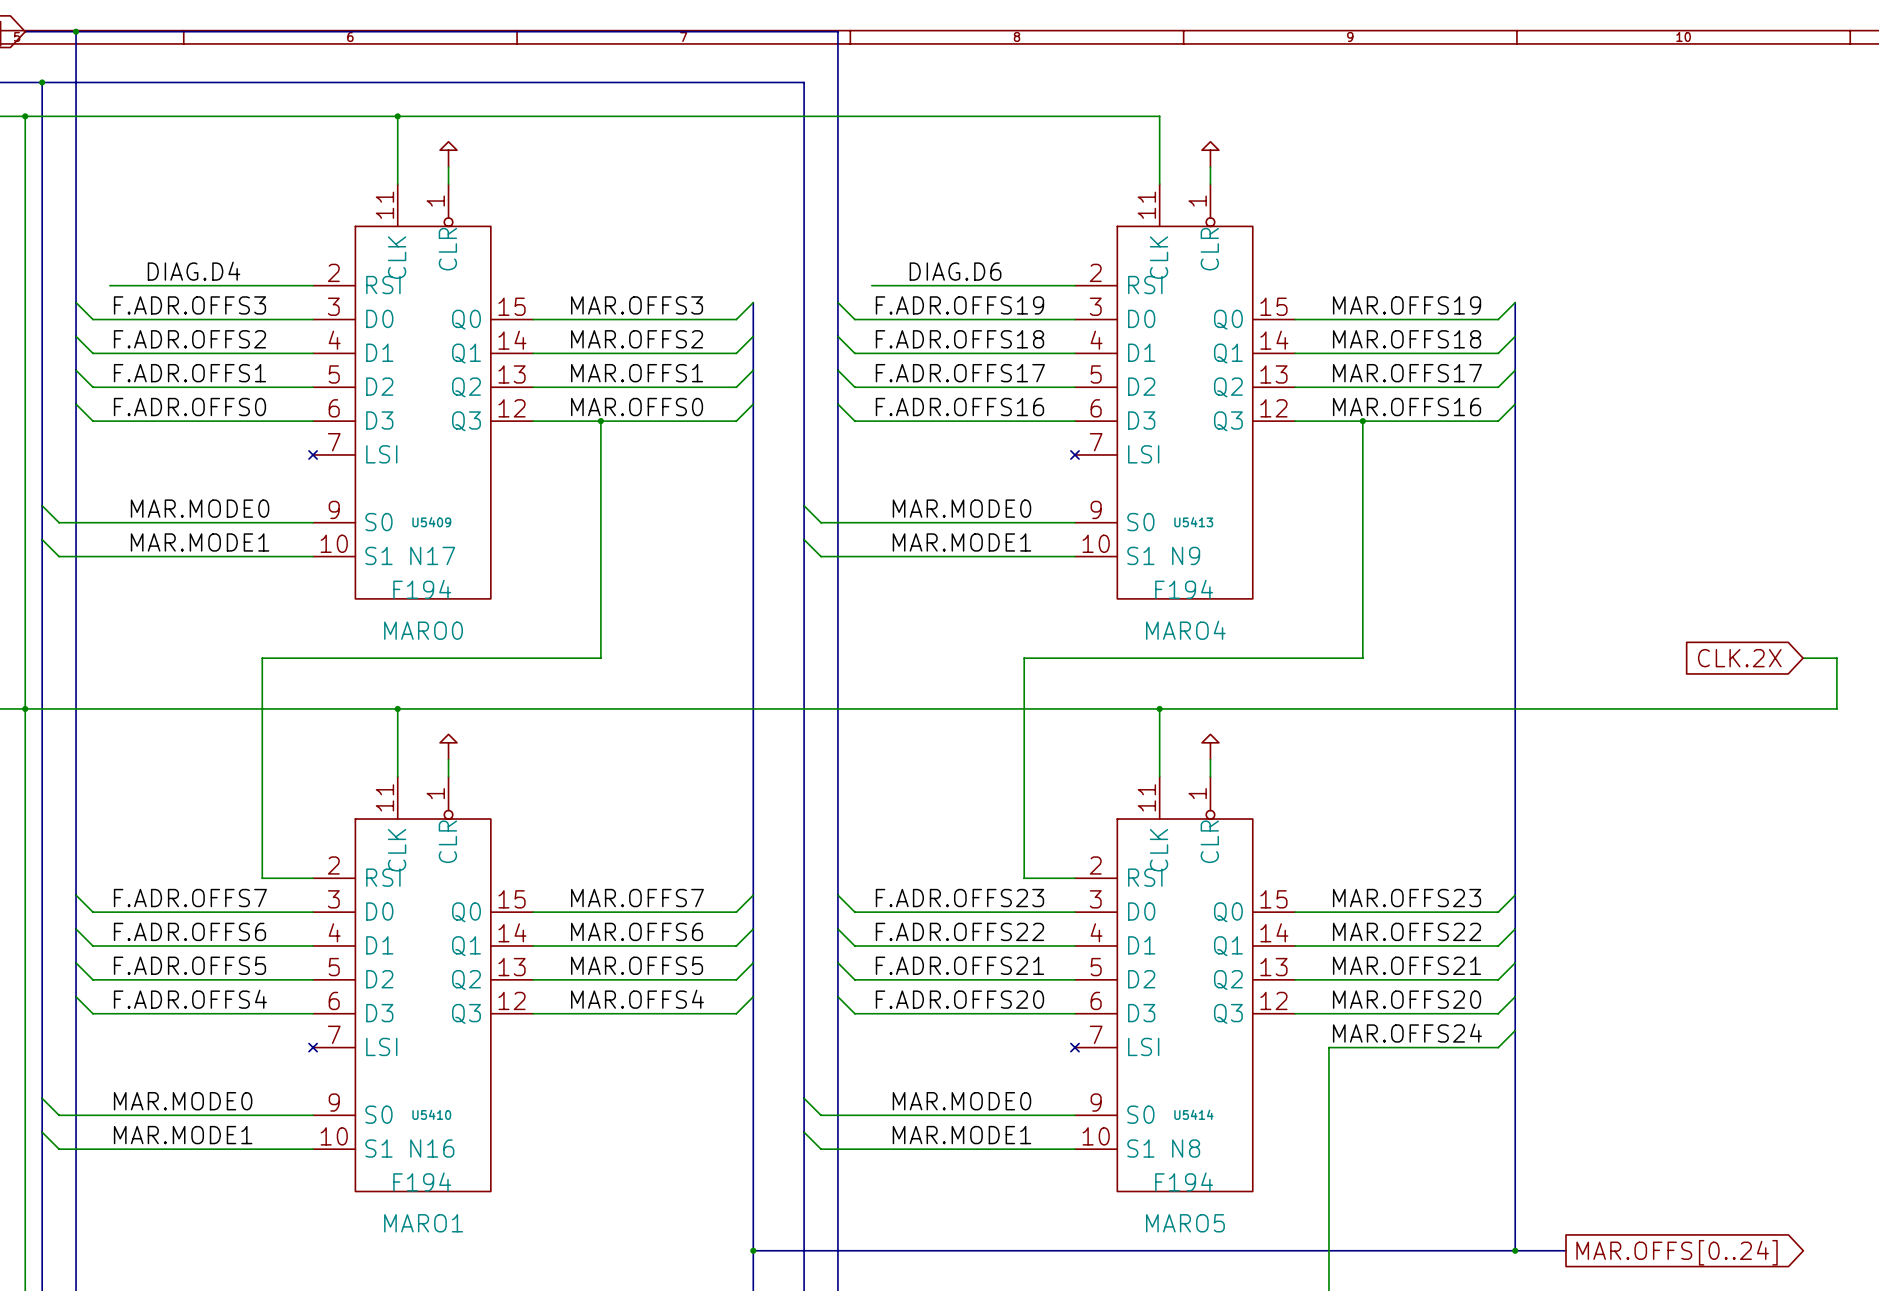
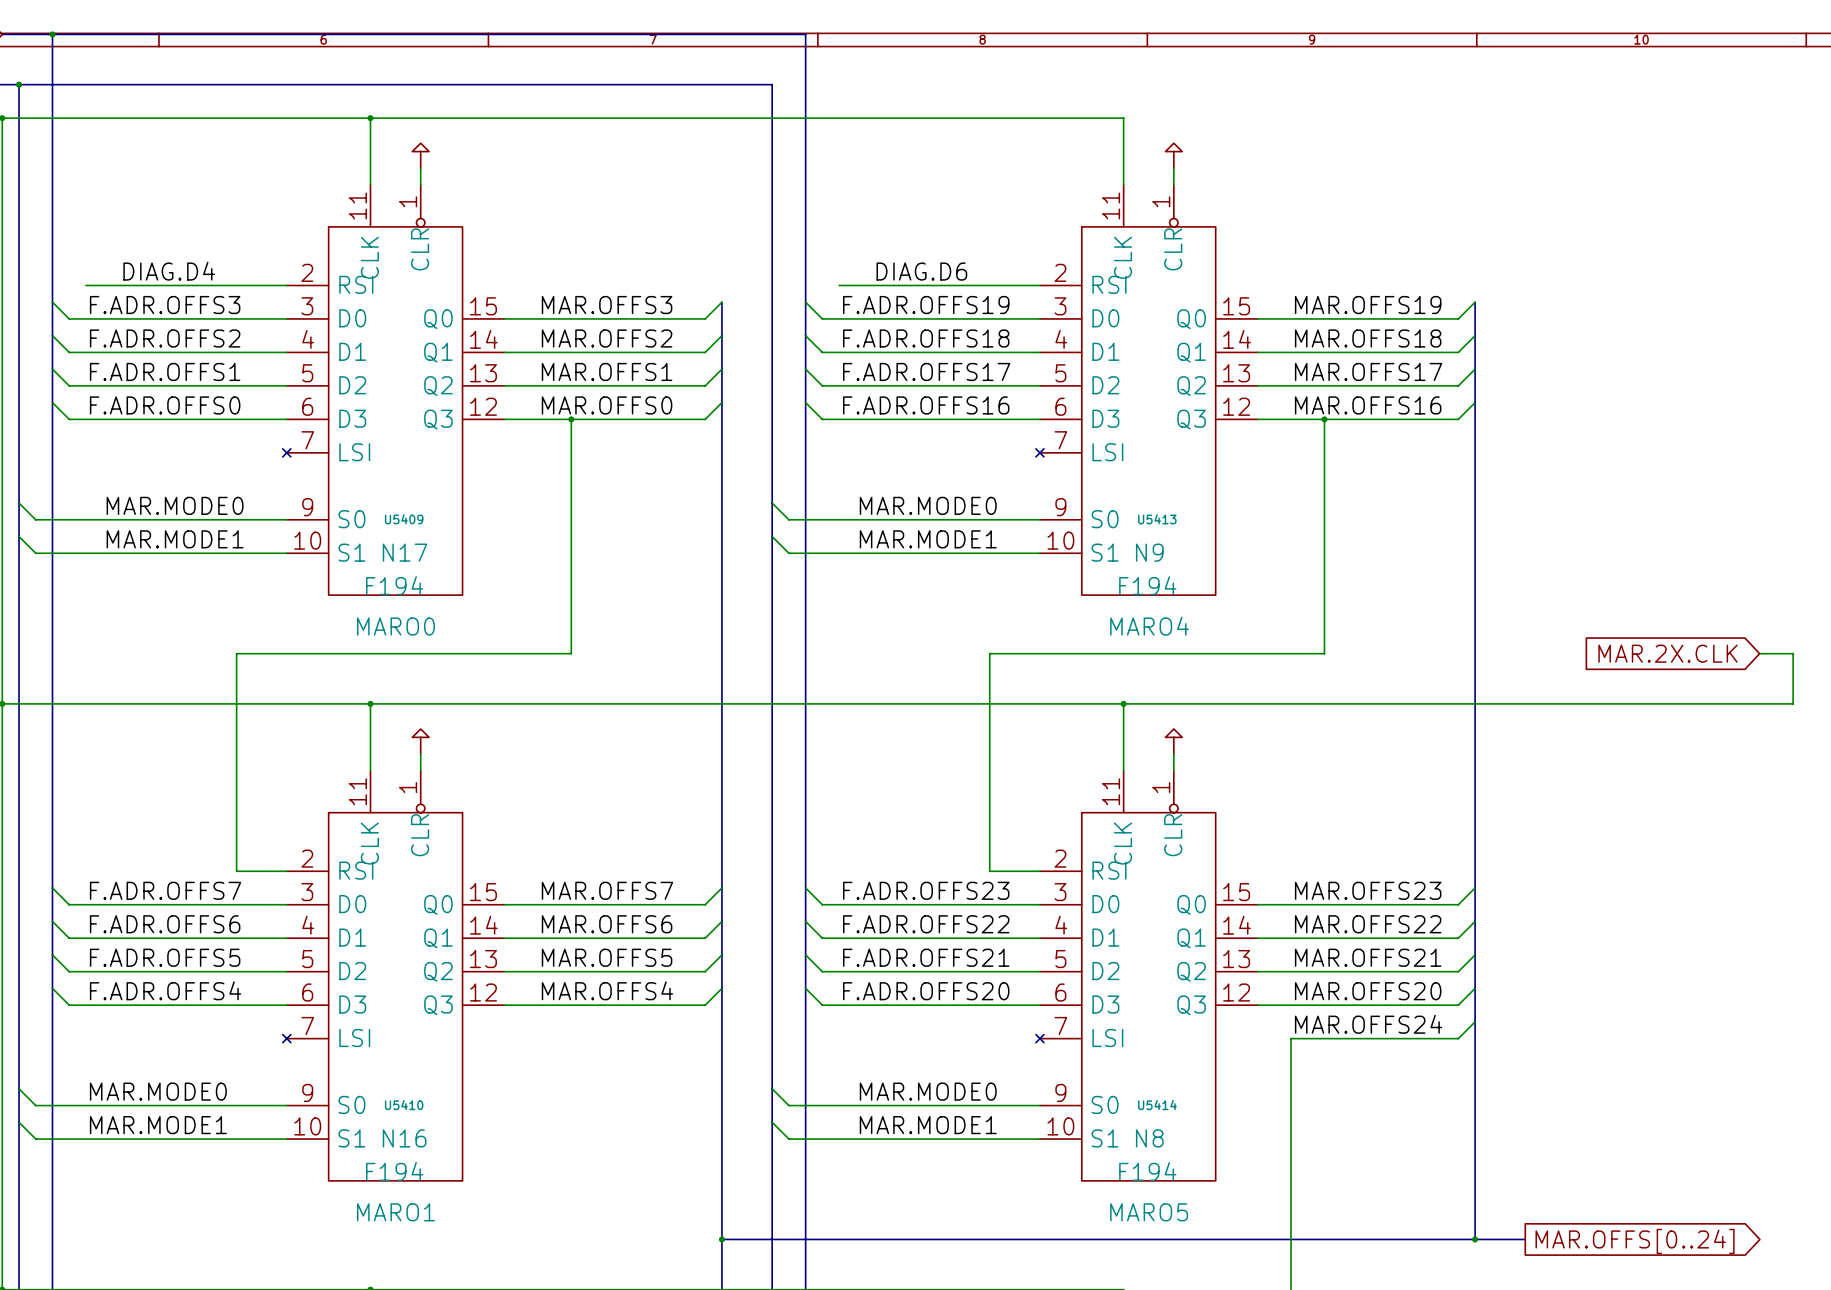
global label: CLK.2X (1739, 658) -> MAR.2X.CLK (1668, 653)

